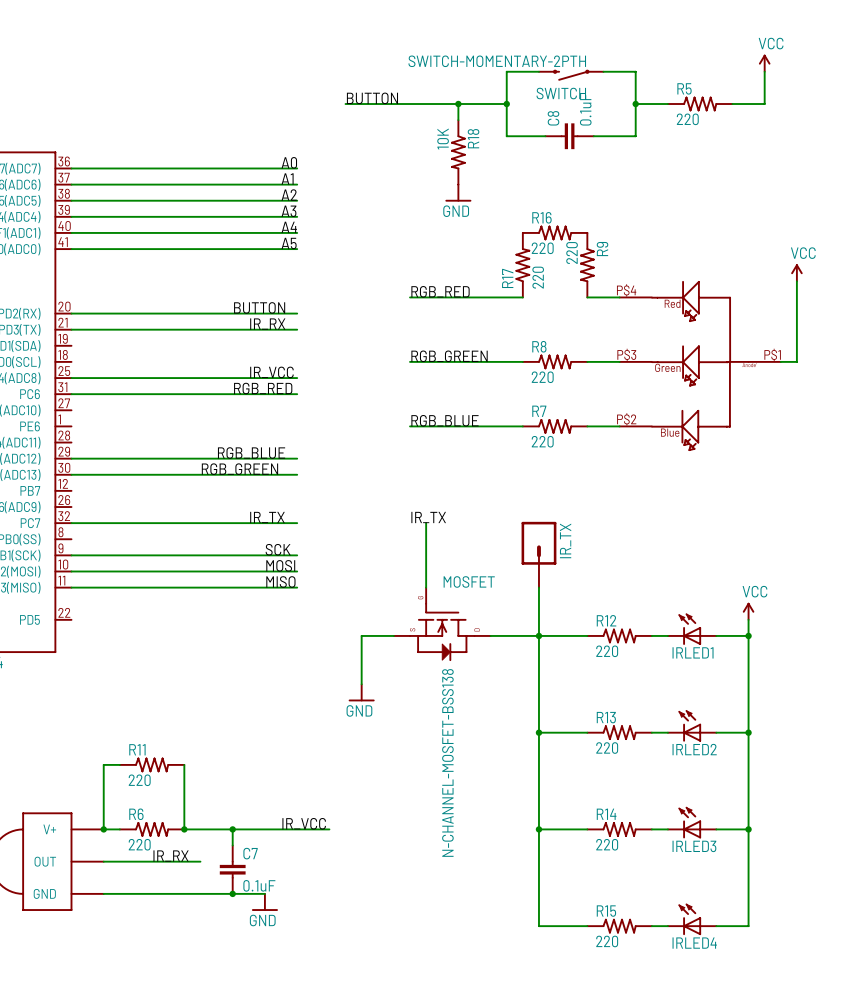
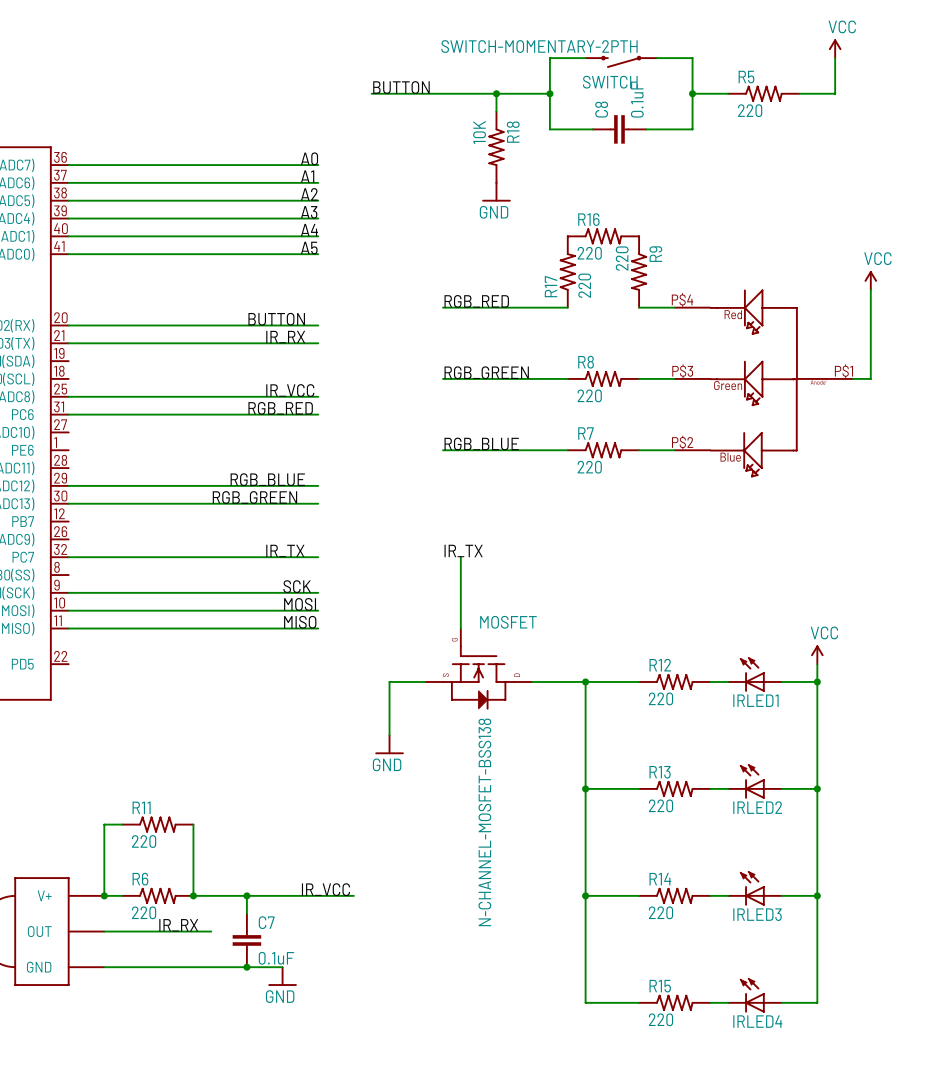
IR_TX: (538, 554) -> none
wire: (538, 587) (538, 635) -> none

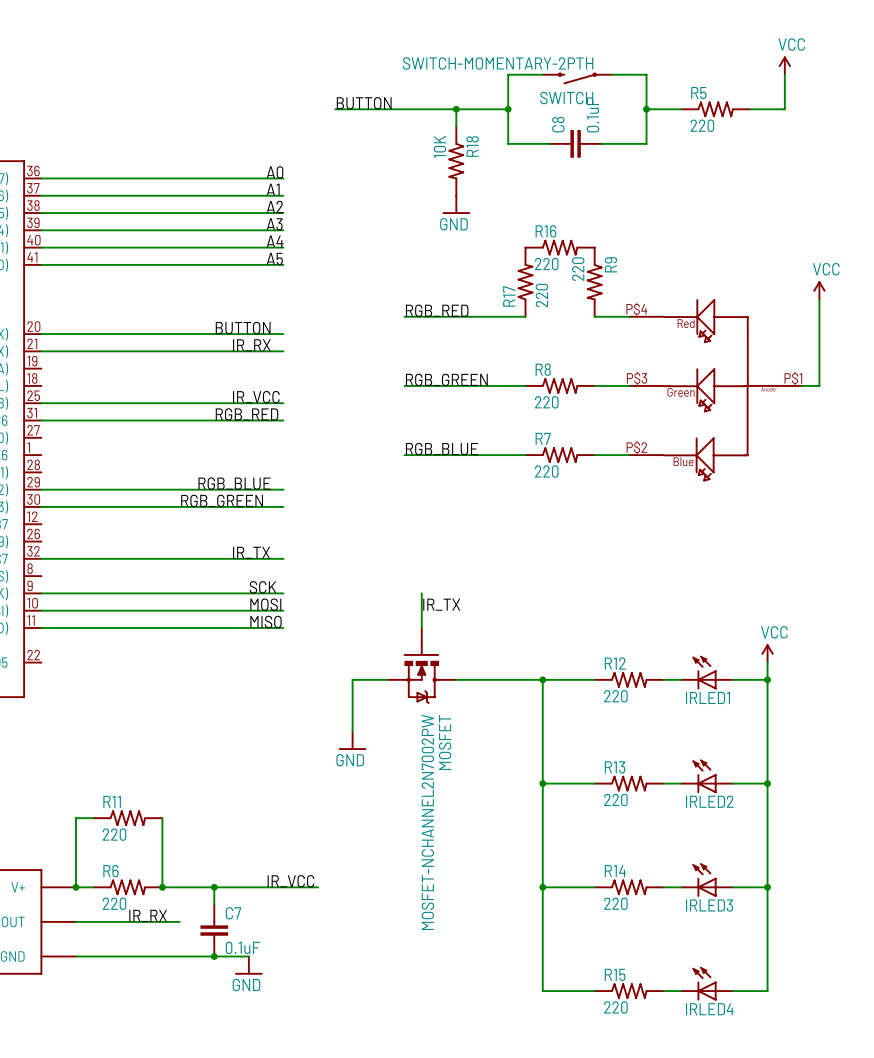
label position: IR_TX (463, 550) -> IR_TX (441, 604)
wire: (460, 557) (460, 592) -> none
MOSFET: none -> MOSFET-NCHANNEL2N7002PW (421, 665)
MOSFET: N-CHANNEL-MOSFET-BSS138 (478, 668) -> none

